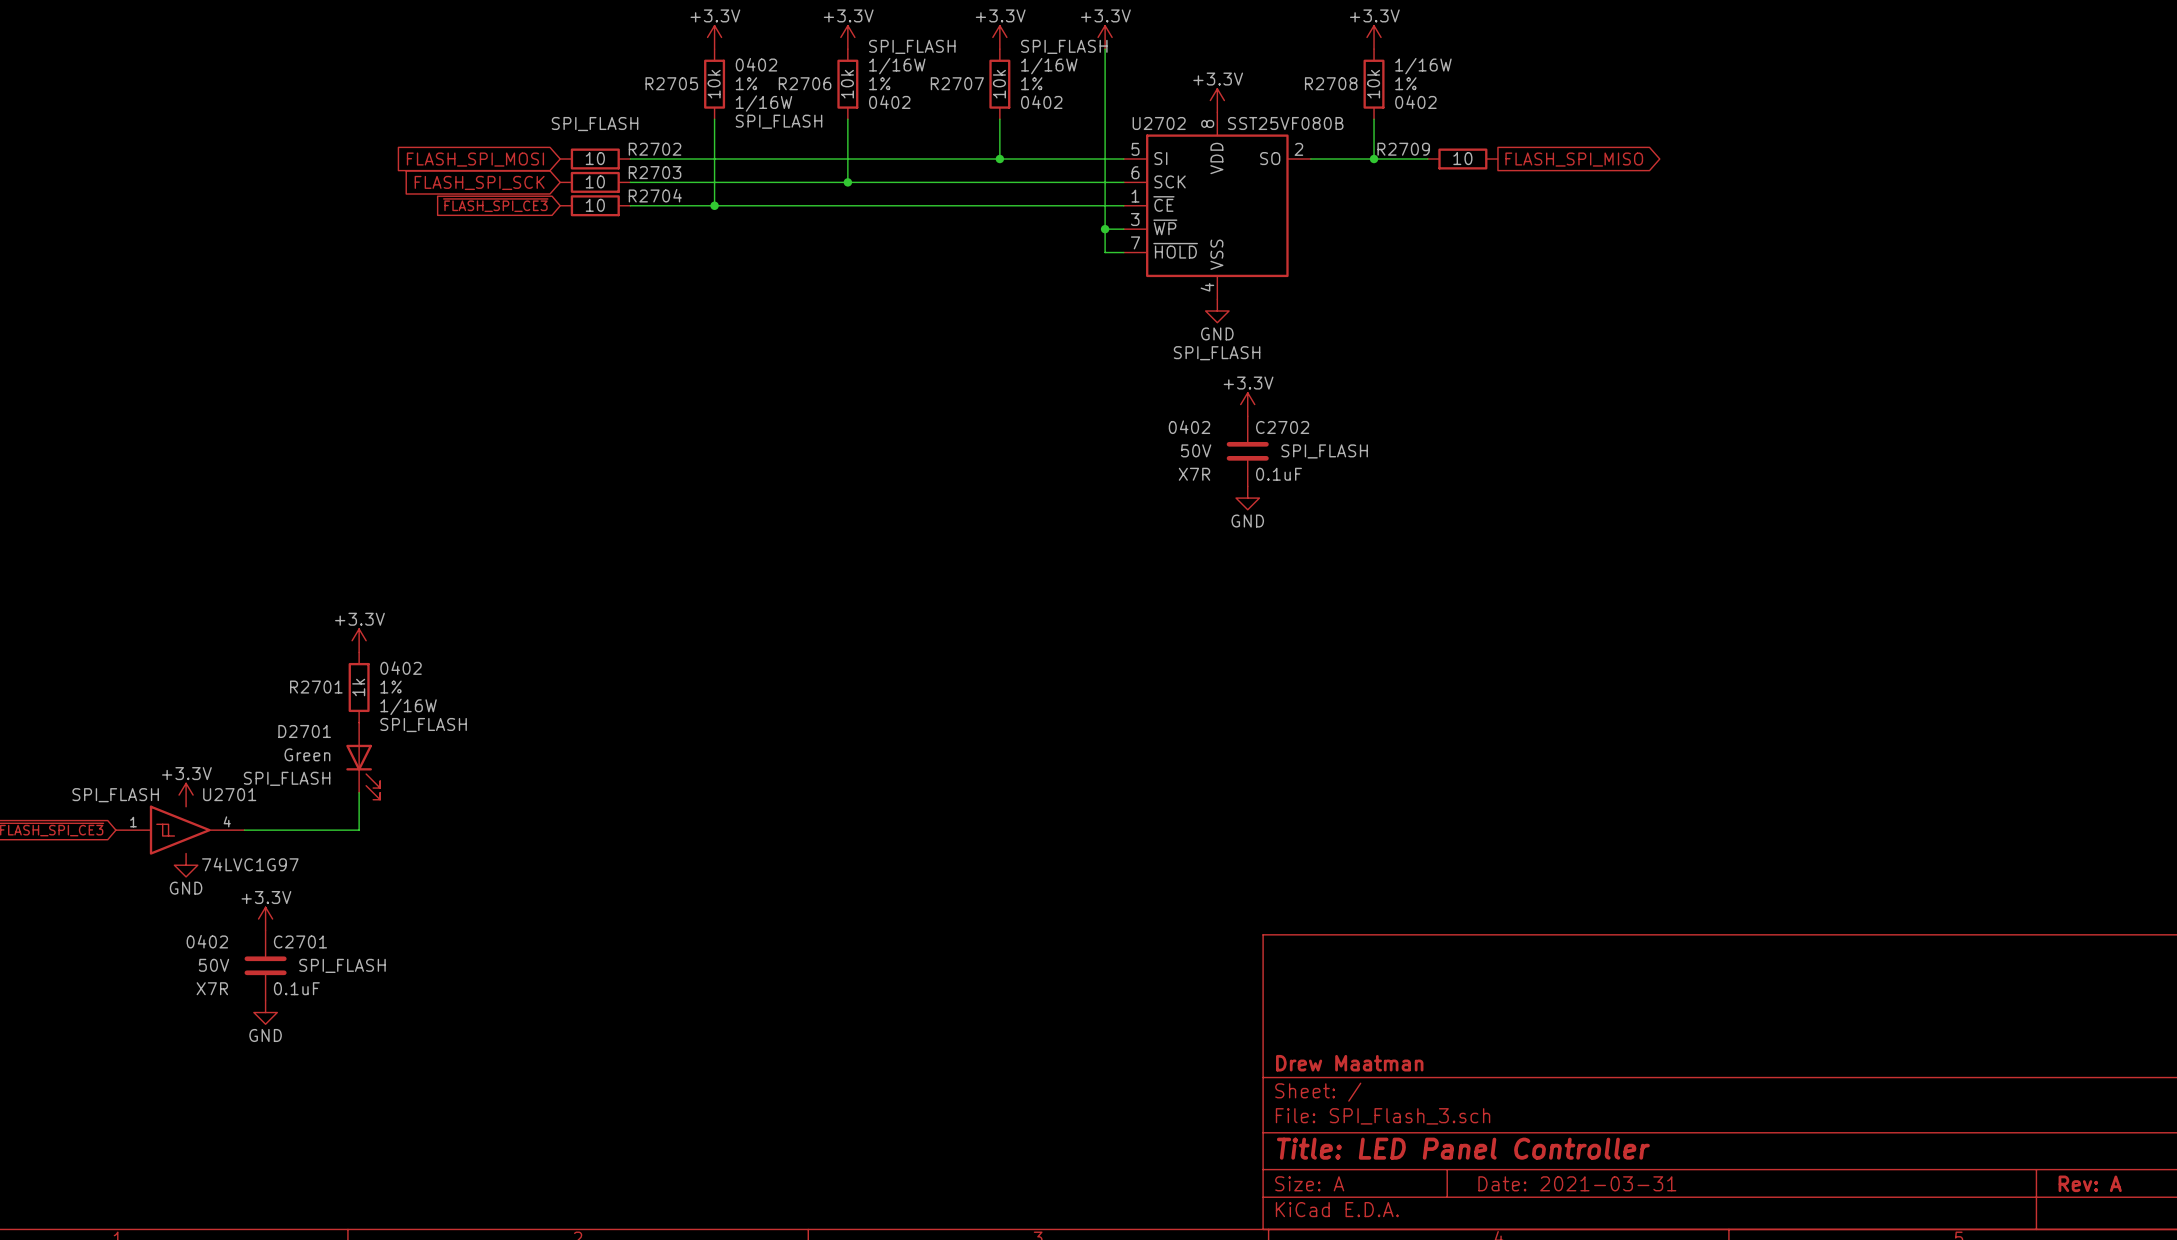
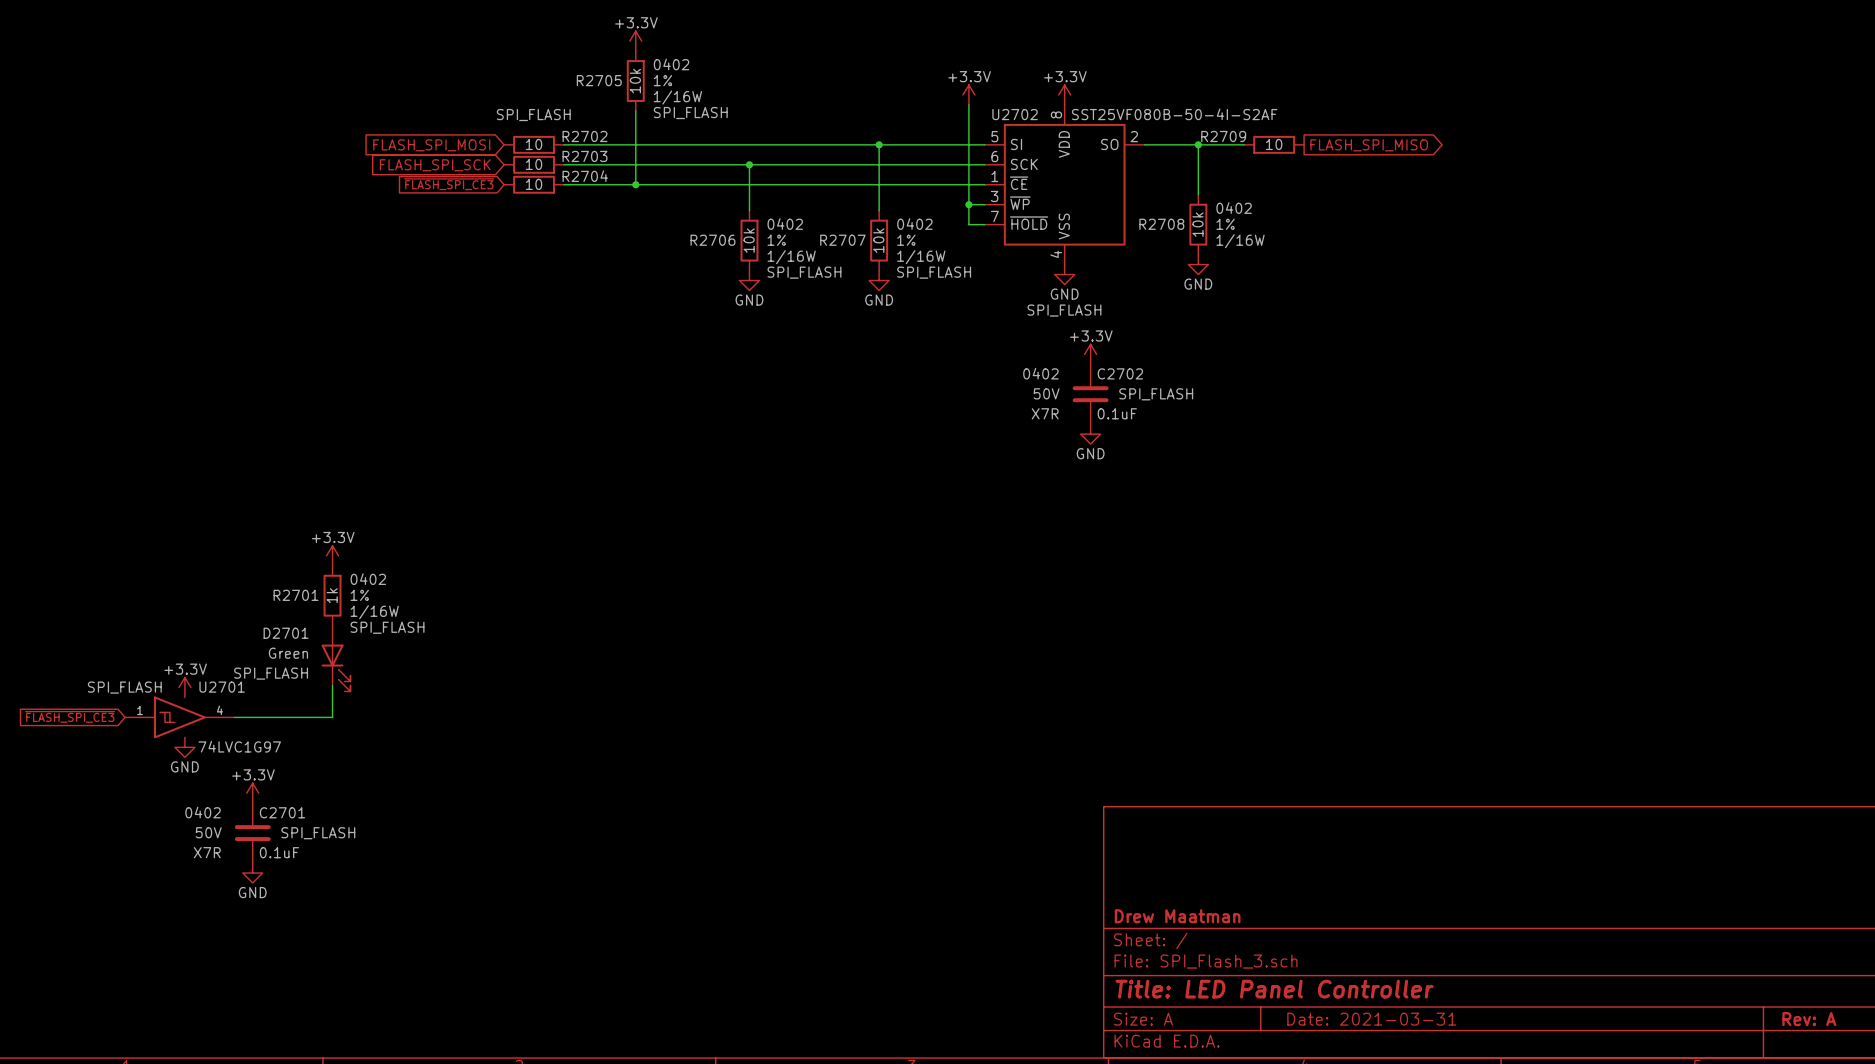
power symbol: +3.3V (847, 37) -> none
power symbol: +3.3V (999, 37) -> none
power symbol: +3.3V (1105, 37) -> none
power symbol: +3.3V (1374, 37) -> none
R2706 text position: SPI_FLASH (912, 46) -> SPI_FLASH (804, 272)
R2707 text position: SPI_FLASH (1064, 46) -> SPI_FLASH (934, 272)
wire: (1105, 49) (1105, 112) -> none
R2706 text position: 1/16W (897, 66) -> 1/16W (791, 257)
R2707 text position: 1/16W (1049, 66) -> 1/16W (921, 257)
R2708 text position: 1/16W (1423, 66) -> 1/16W (1240, 241)
R2706 position: (847, 84) -> (749, 240)
R2707 position: (999, 84) -> (879, 240)
R2708 position: (1374, 84) -> (1198, 224)
power symbol: none -> +3.3V (968, 94)
R2706 text position: 0402 (889, 102) -> 0402 (785, 224)
R2707 text position: 0402 (1041, 102) -> 0402 (914, 224)
R2708 text position: 0402 (1415, 102) -> 0402 (1234, 208)
wire: (847, 119) (847, 182) -> (749, 210) (749, 164)
wire: (999, 119) (999, 159) -> (879, 210) (879, 144)
wire: (1374, 119) (1374, 159) -> (1198, 194) (1198, 144)
U2702 value: SST25VF080B (1285, 123) -> SST25VF080B-50-4I-S2AF (1174, 114)
power symbol: none -> GND (1198, 264)
power symbol: none -> GND (749, 280)
power symbol: none -> GND (879, 280)

